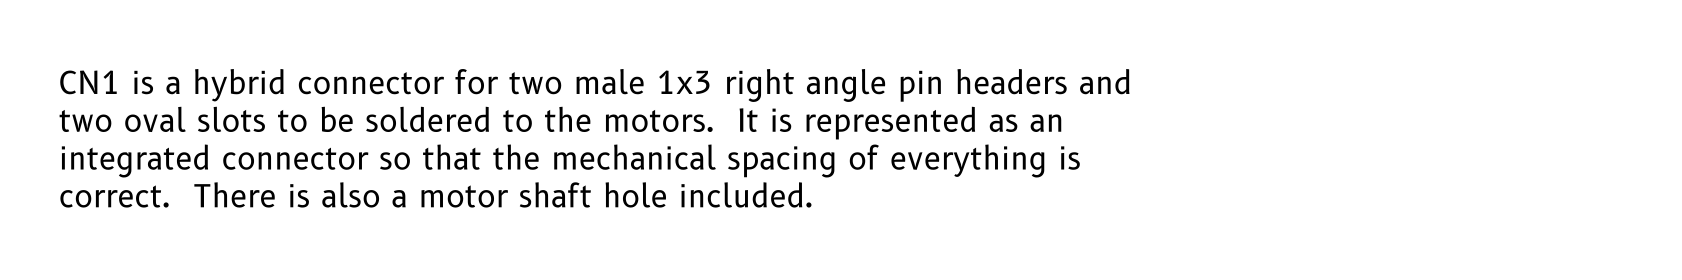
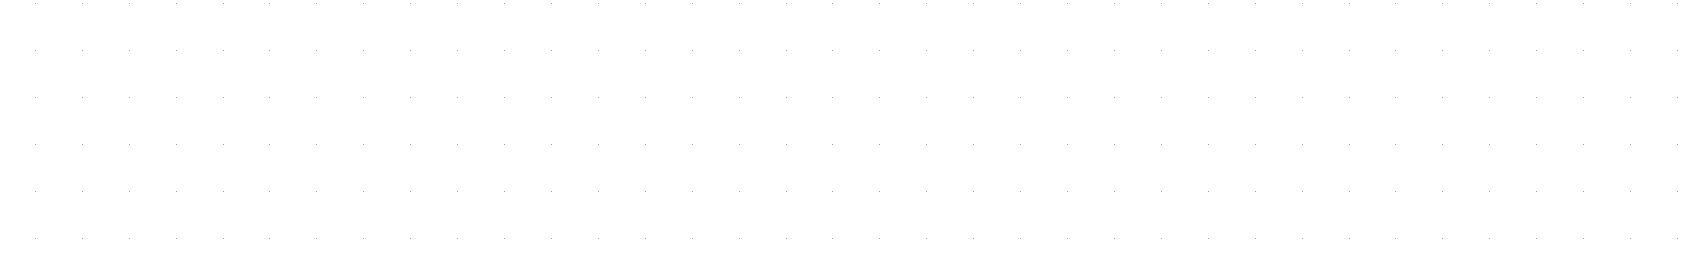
text: CN1 is a hybrid connector for two male 1x3 right angle pin headers and (594, 85) -> none
text: two oval slots to be soldered to the motors. It is represented as an (560, 123) -> none
text: integrated connector so that the mechanical spacing of everything is (570, 161) -> none
text: correct. There is also a motor shaft hole included. (435, 194) -> none

